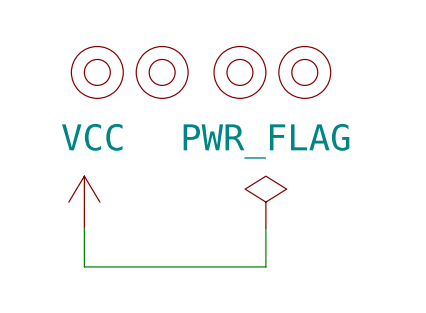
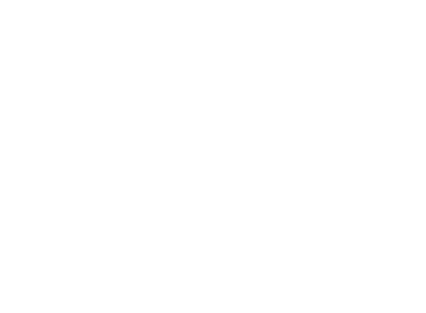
part: (97, 72) -> none
part: (162, 72) -> none
part: (239, 72) -> none
part: (304, 72) -> none
power symbol: VCC (84, 202) -> none
power symbol: PWR_FLAG (265, 202) -> none
wire: (84, 228) (84, 266) (265, 266) (265, 228) -> none

